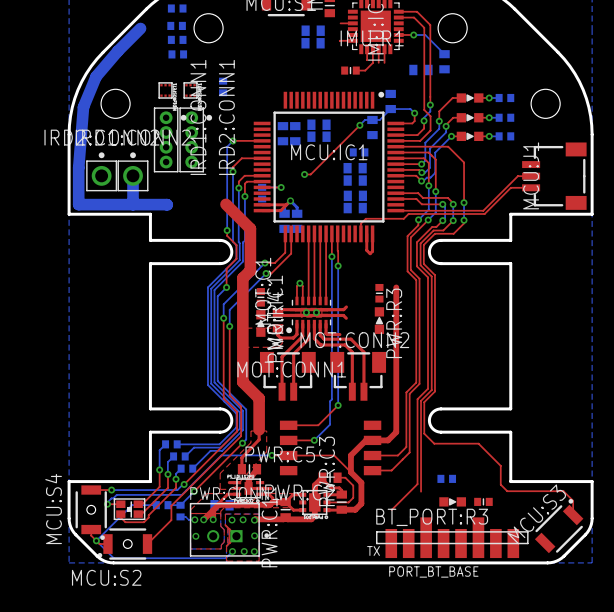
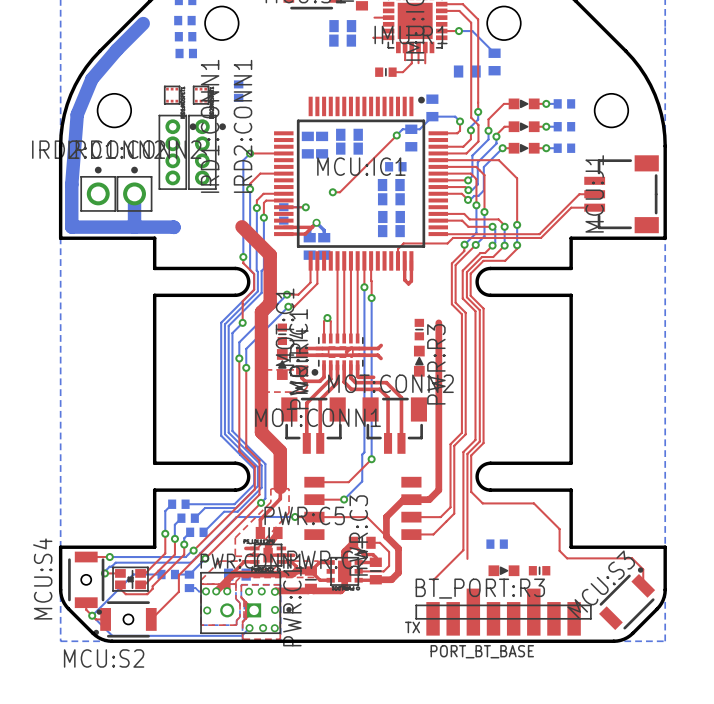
via: (306, 312) -> none
via: (316, 312) -> none

